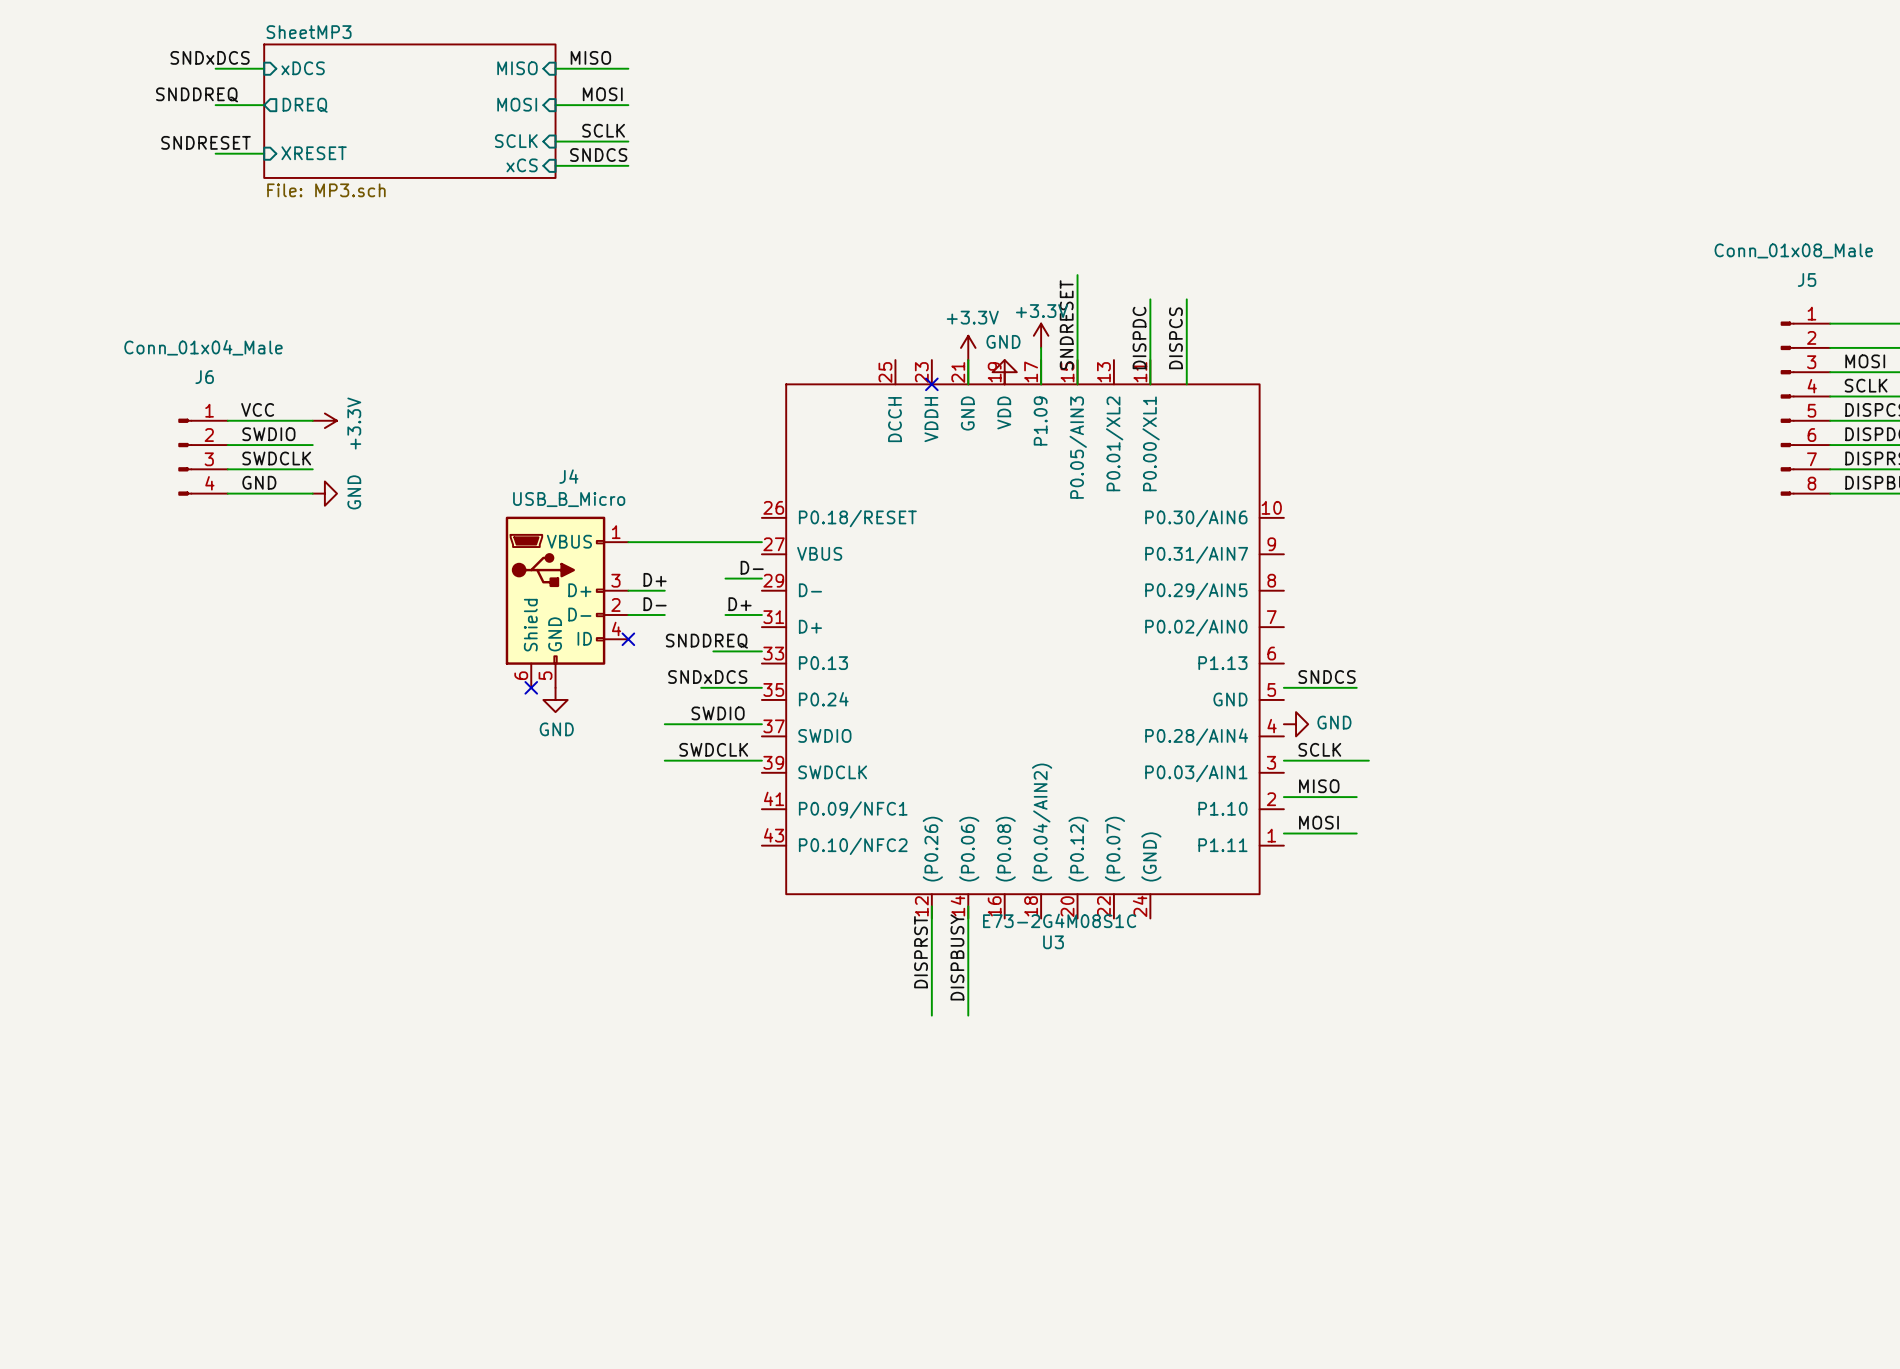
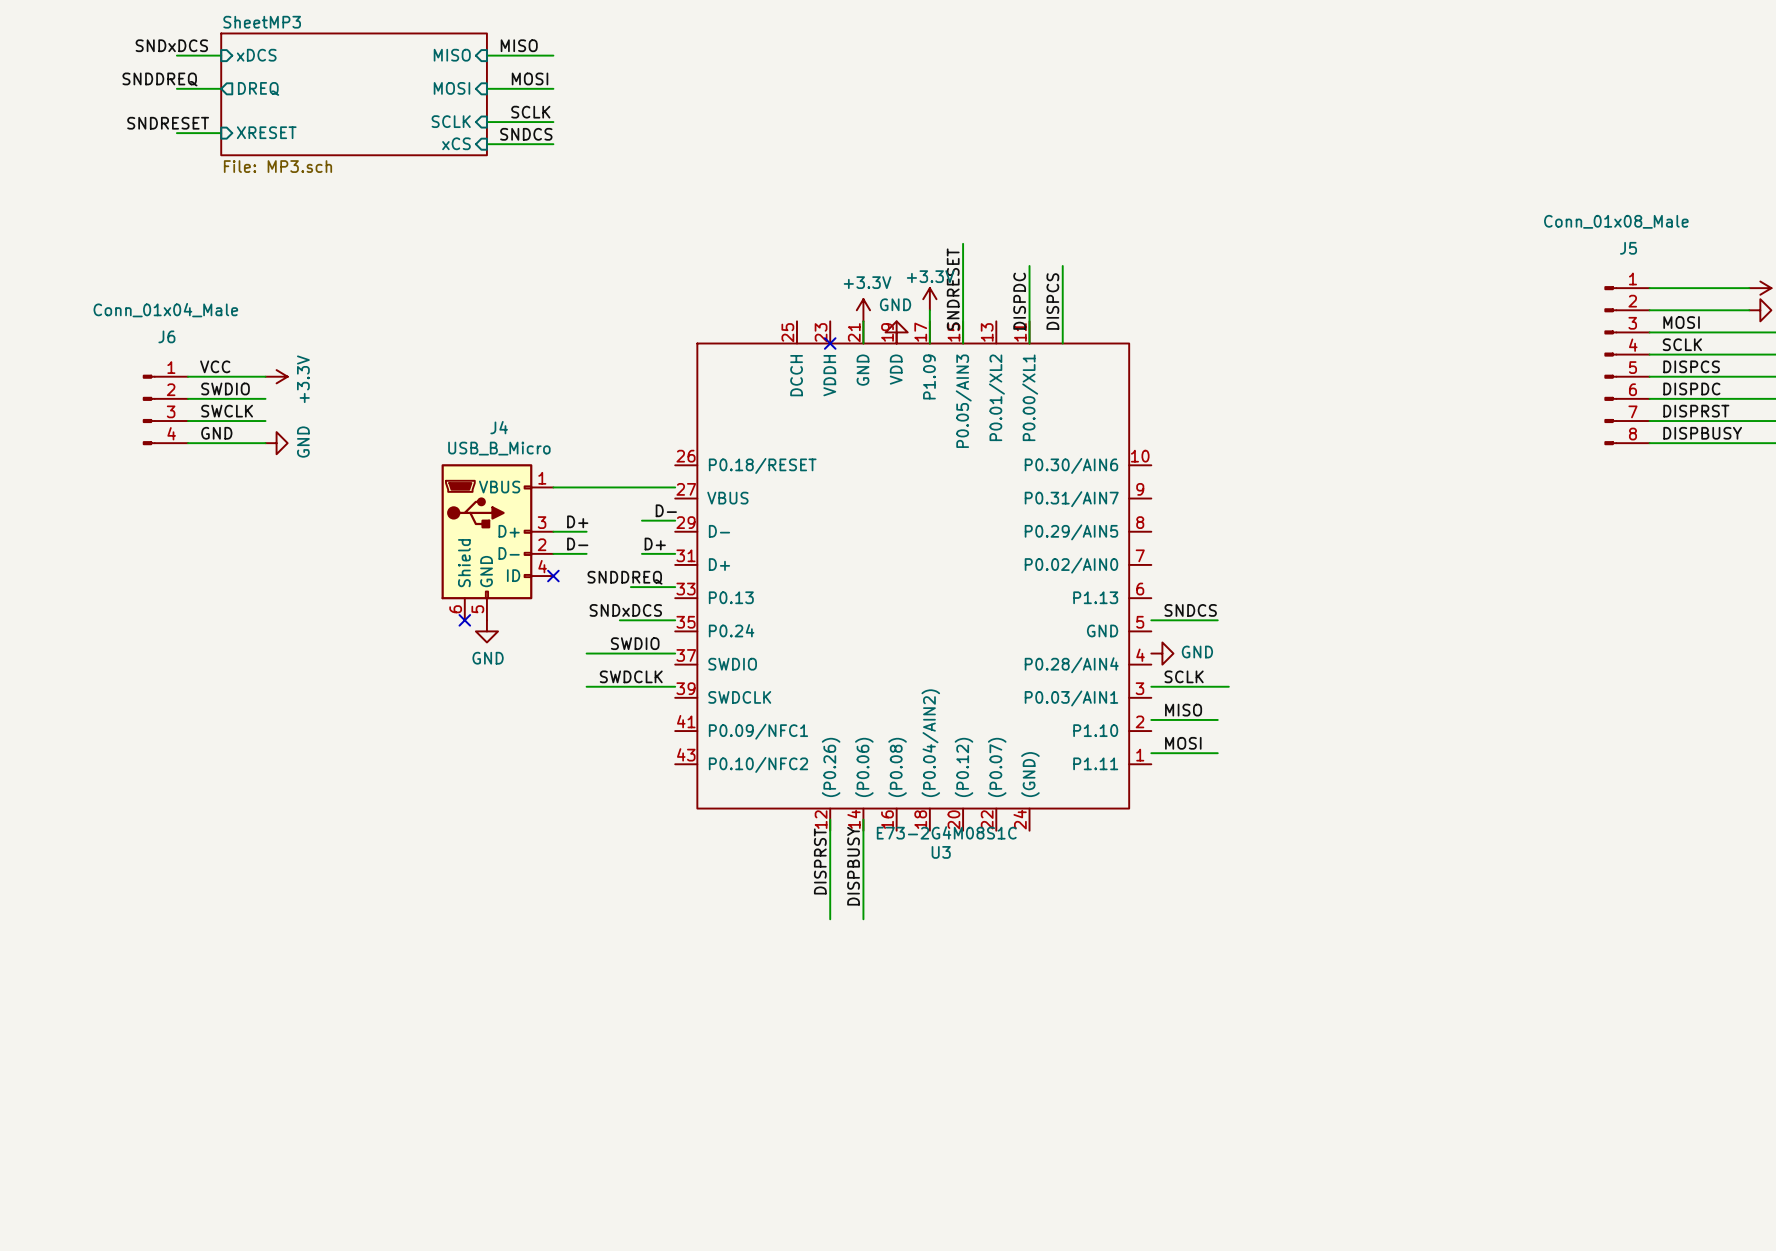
label: SWDCLK (276, 458) -> SWCLK (227, 411)

